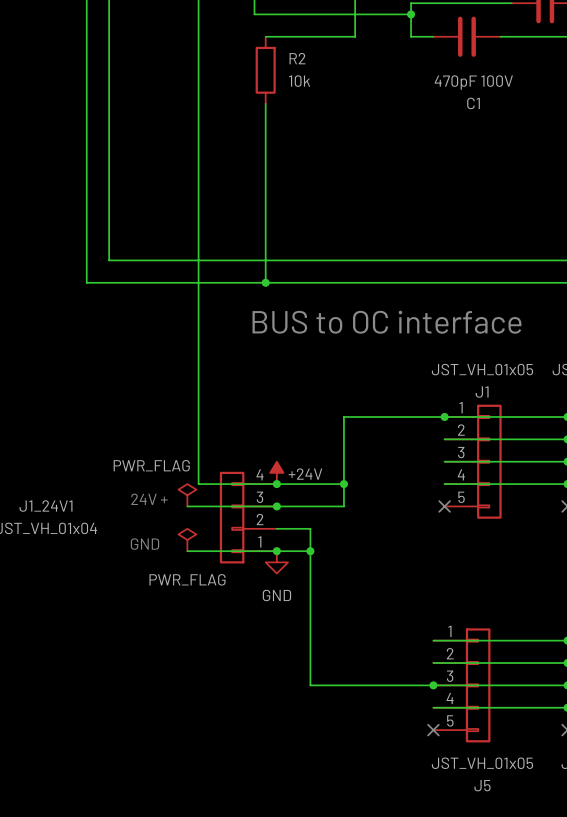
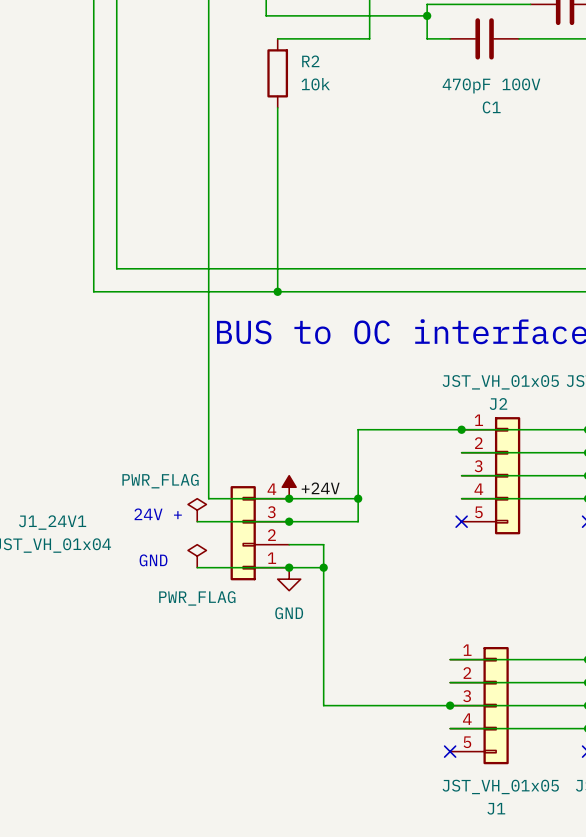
J1 name: J1 (482, 392) -> J2 (498, 404)
J5 name: J5 (482, 785) -> J1 (496, 808)

